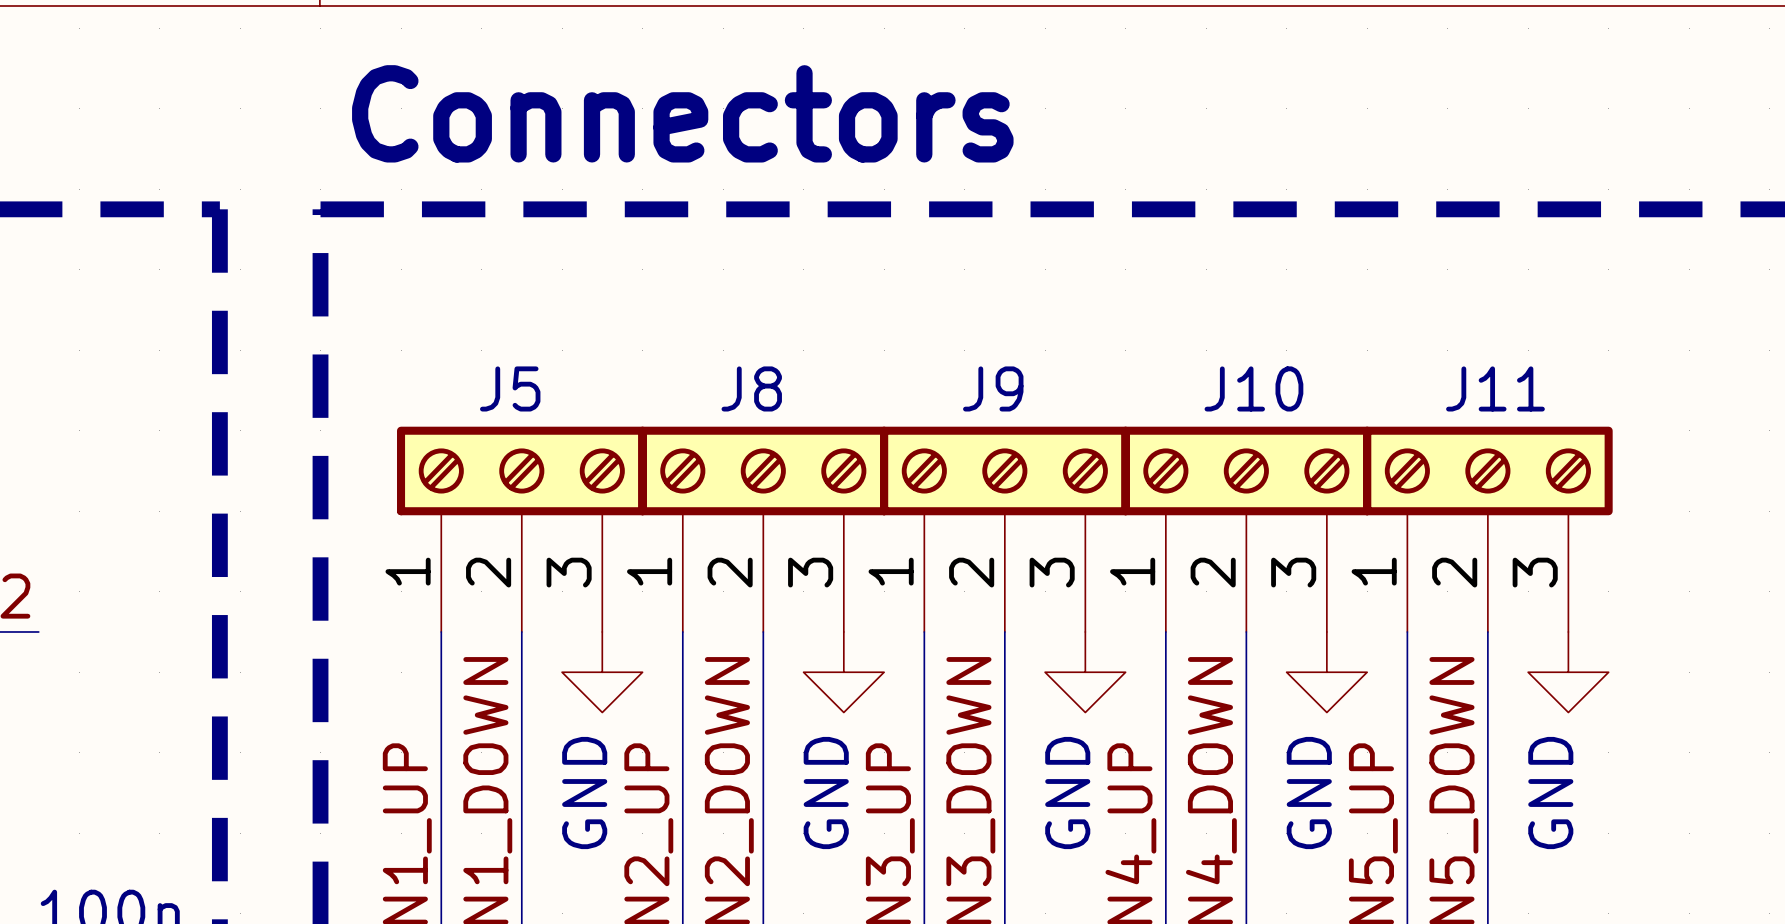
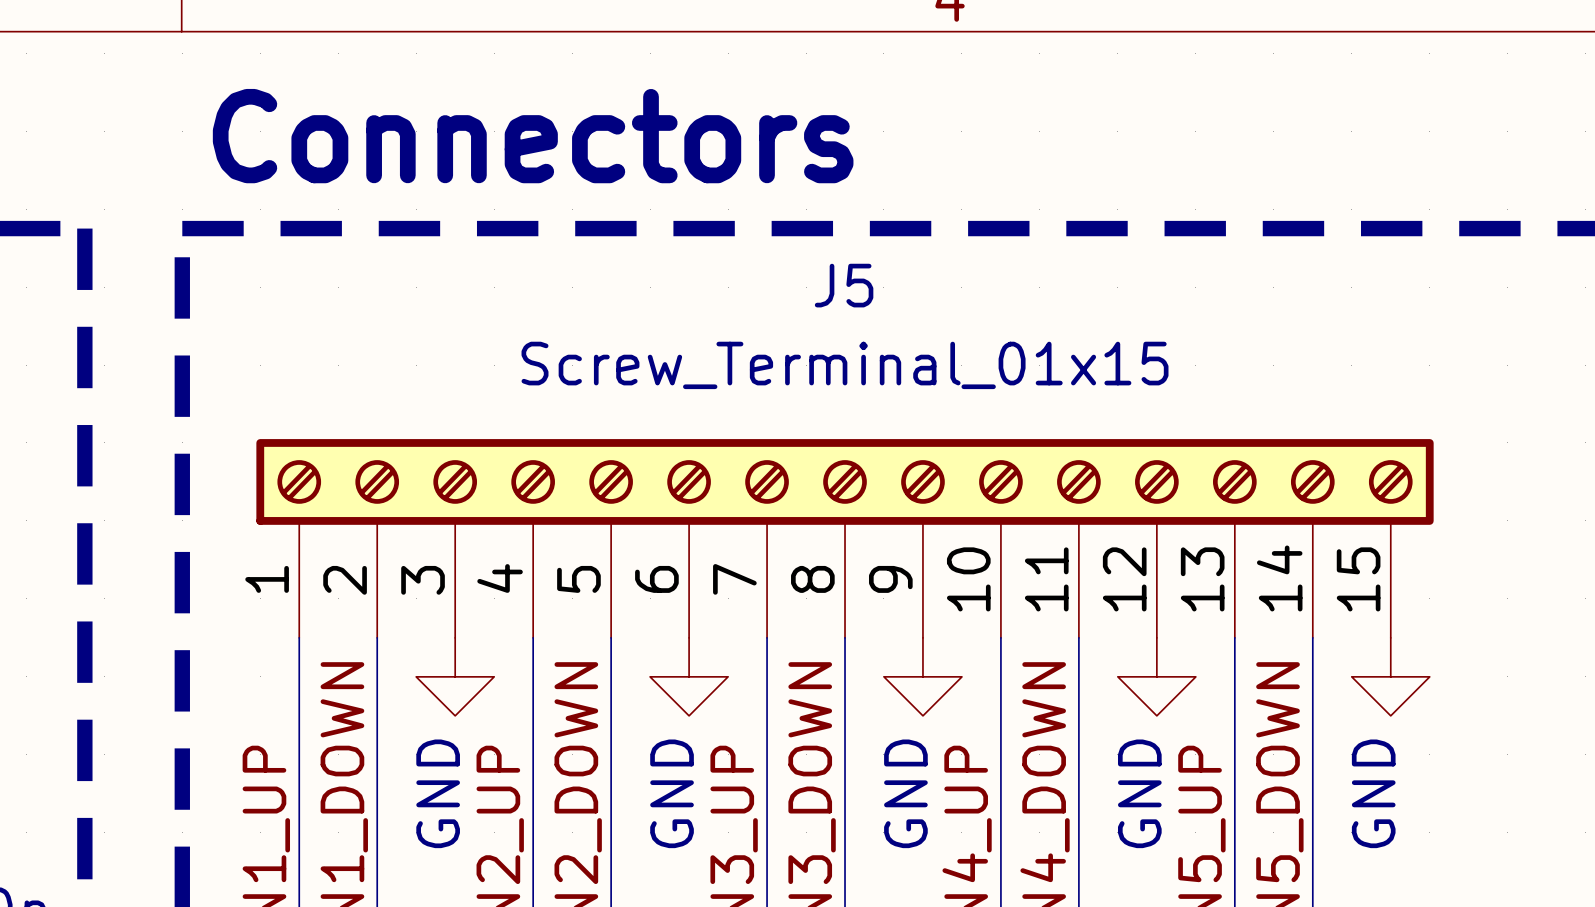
J5 value: none -> Screw_Terminal_01x15 (845, 365)
J5 name position: J5 (510, 388) -> J5 (844, 285)
J5 symbol: [397, 426, 647, 632] -> [256, 439, 1434, 638]
J8: (763, 529) -> none
J9: (1004, 529) -> none
J10: (1246, 529) -> none
J11: (1487, 529) -> none

